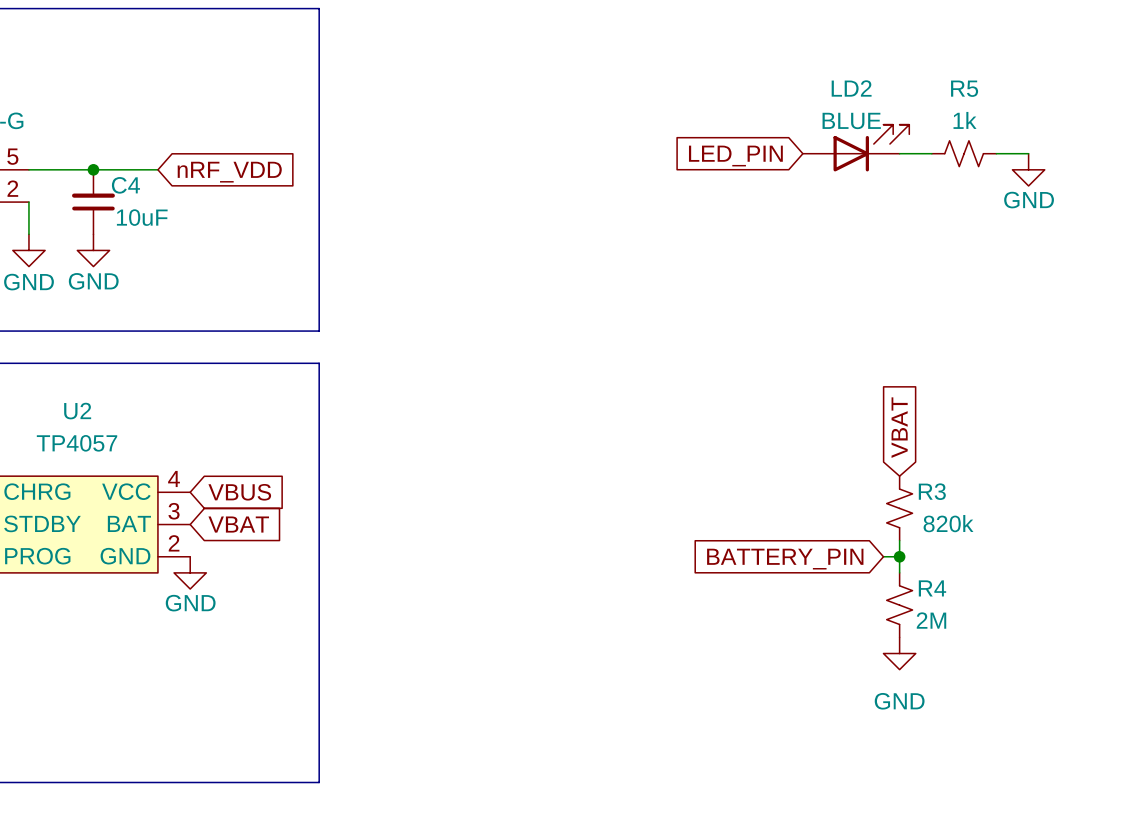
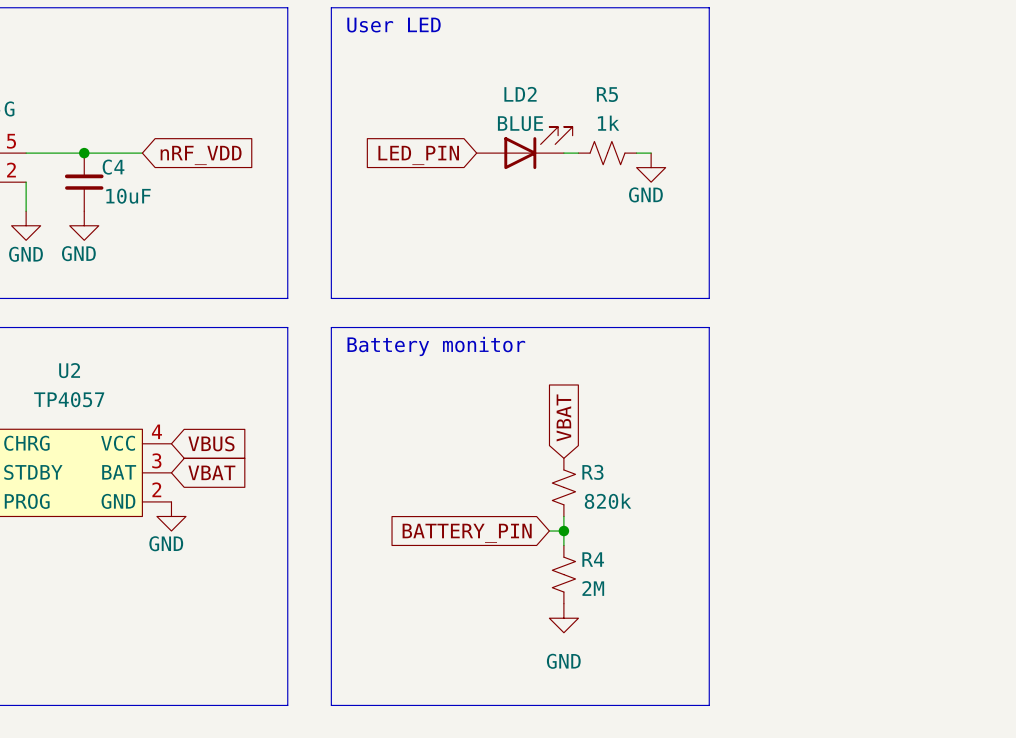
line: none -> (331, 7) (331, 298) (709, 298) (709, 7) (331, 7)
text: none -> User LED (393, 25)
LD2 position: (856, 148) -> (524, 148)
wire: (899, 153) (931, 153) -> none
R5 position: (964, 153) -> (607, 153)
wire: (996, 153) (1028, 153) -> none
global label position: LED_PIN (735, 156) -> LED_PIN (418, 155)
wire: none -> (563, 153) (578, 153)
power symbol: GND (1028, 169) -> none
power symbol: none -> GND (651, 167)
line: none -> (331, 327) (709, 327) (709, 705) (331, 705) (331, 327)
text: none -> Battery monitor (436, 346)
global label position: VBAT (899, 427) -> VBAT (563, 417)
R3 position: (899, 508) -> (563, 487)
wire: (899, 540) (899, 572) -> (563, 516) (563, 545)
wire: (883, 556) (899, 556) -> (549, 531) (563, 531)
junction: (899, 556) -> none
global label position: BATTERY_PIN (785, 559) -> BATTERY_PIN (467, 533)
junction: none -> (563, 531)
R4 position: (899, 605) -> (563, 574)
power symbol: GND (899, 653) -> none
power symbol: none -> GND (563, 618)

